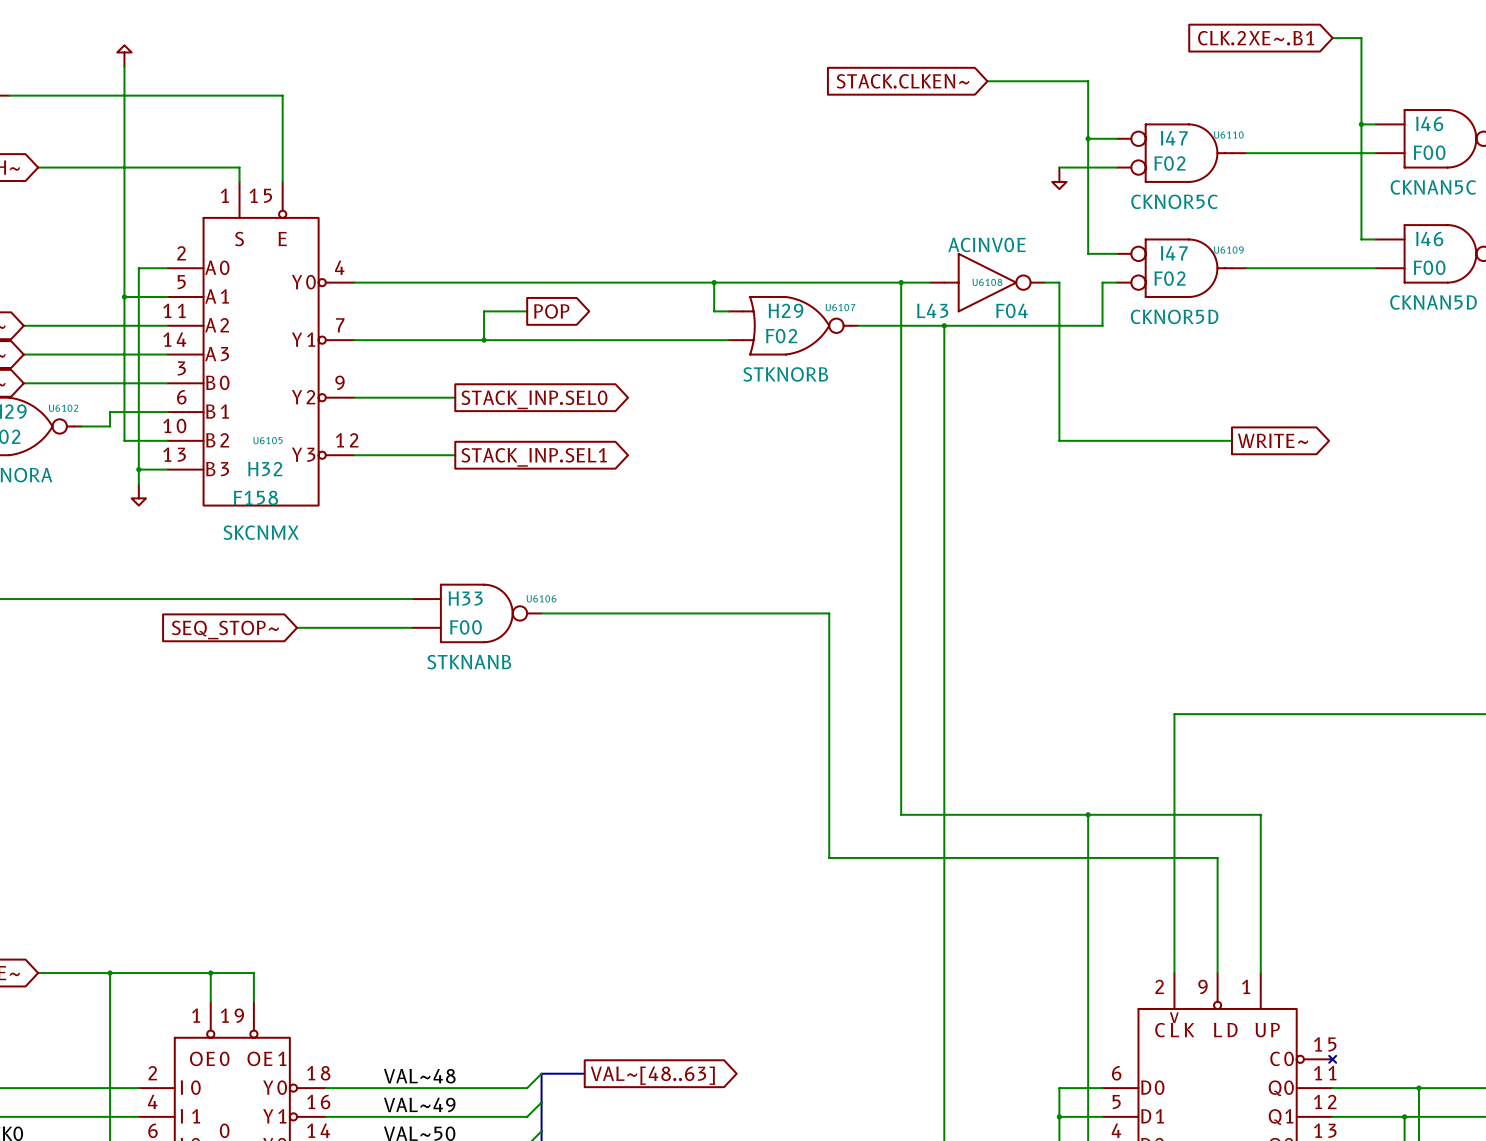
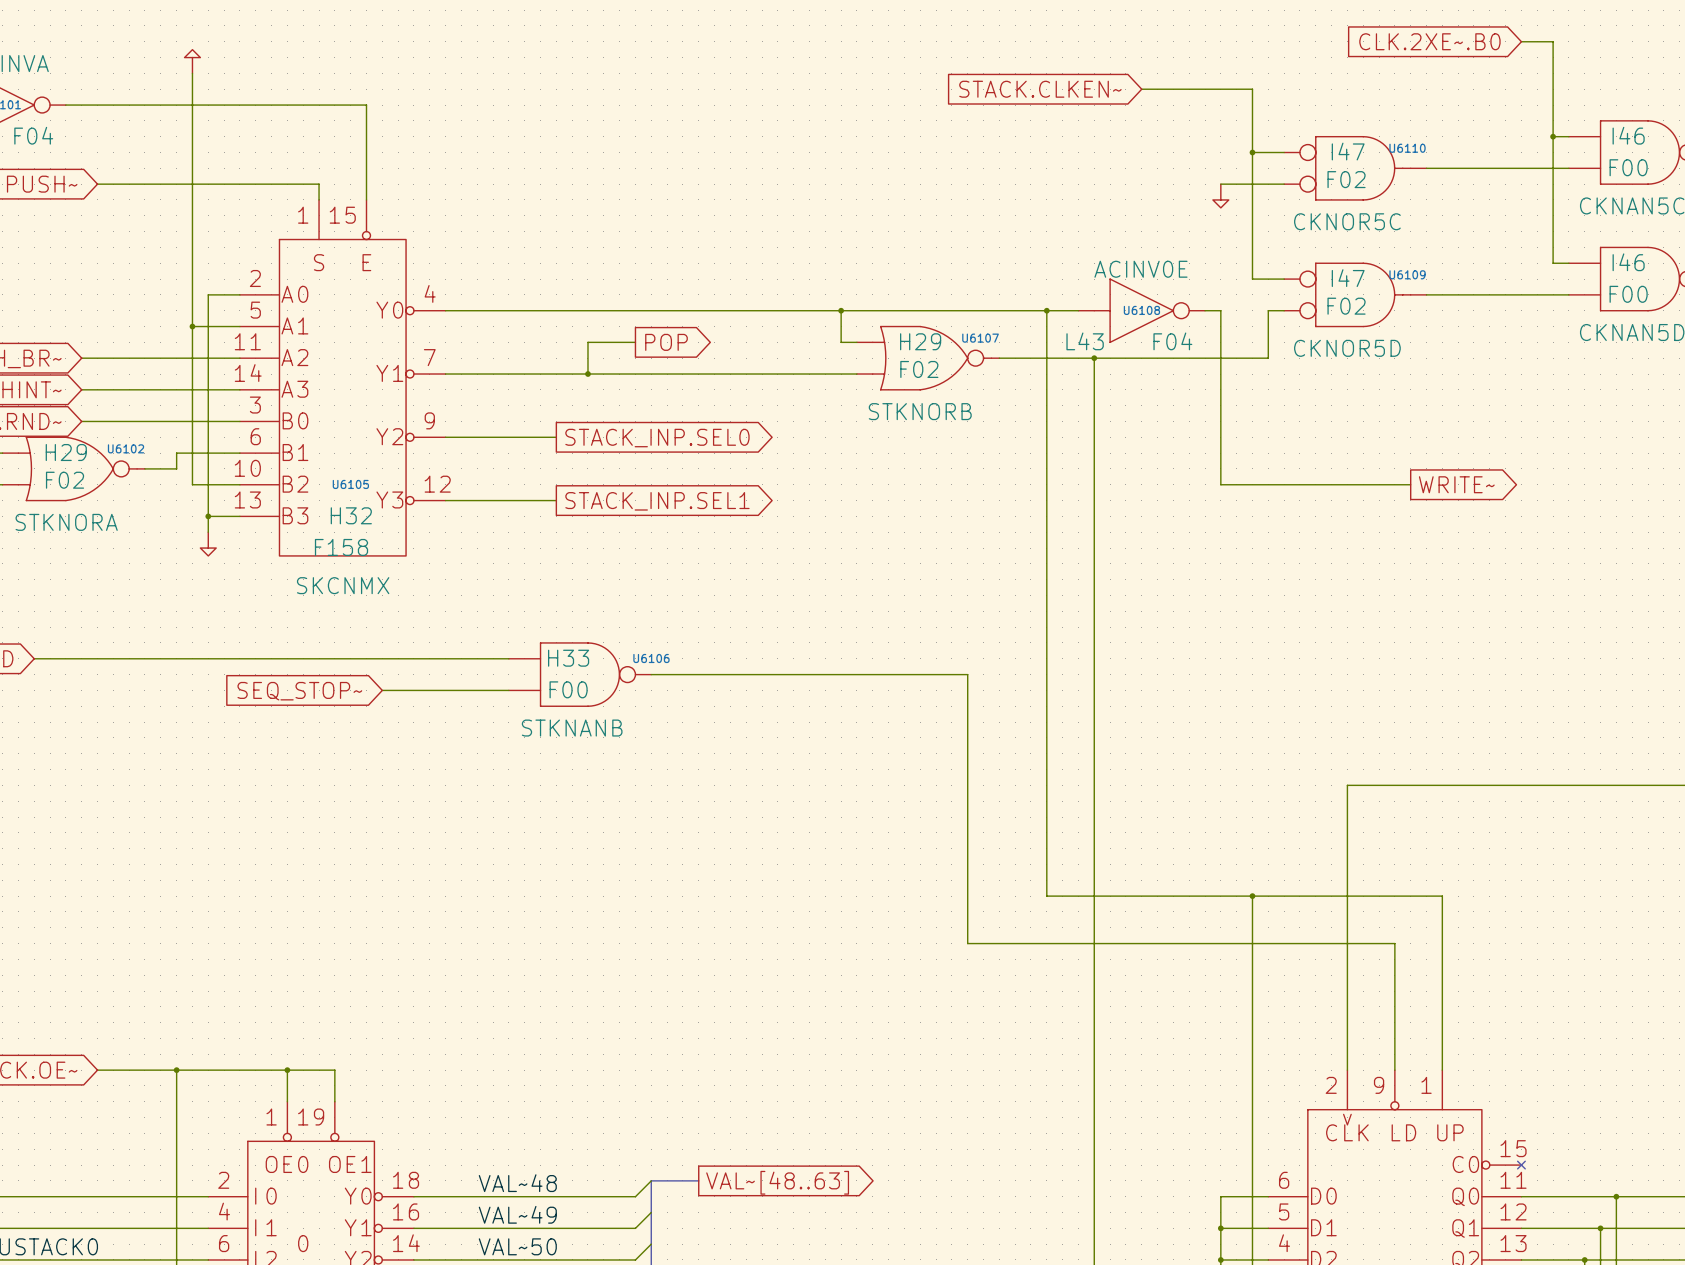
global label: CLK.2XE~.B1 (1256, 38) -> CLK.2XE~.B0 (1429, 41)

